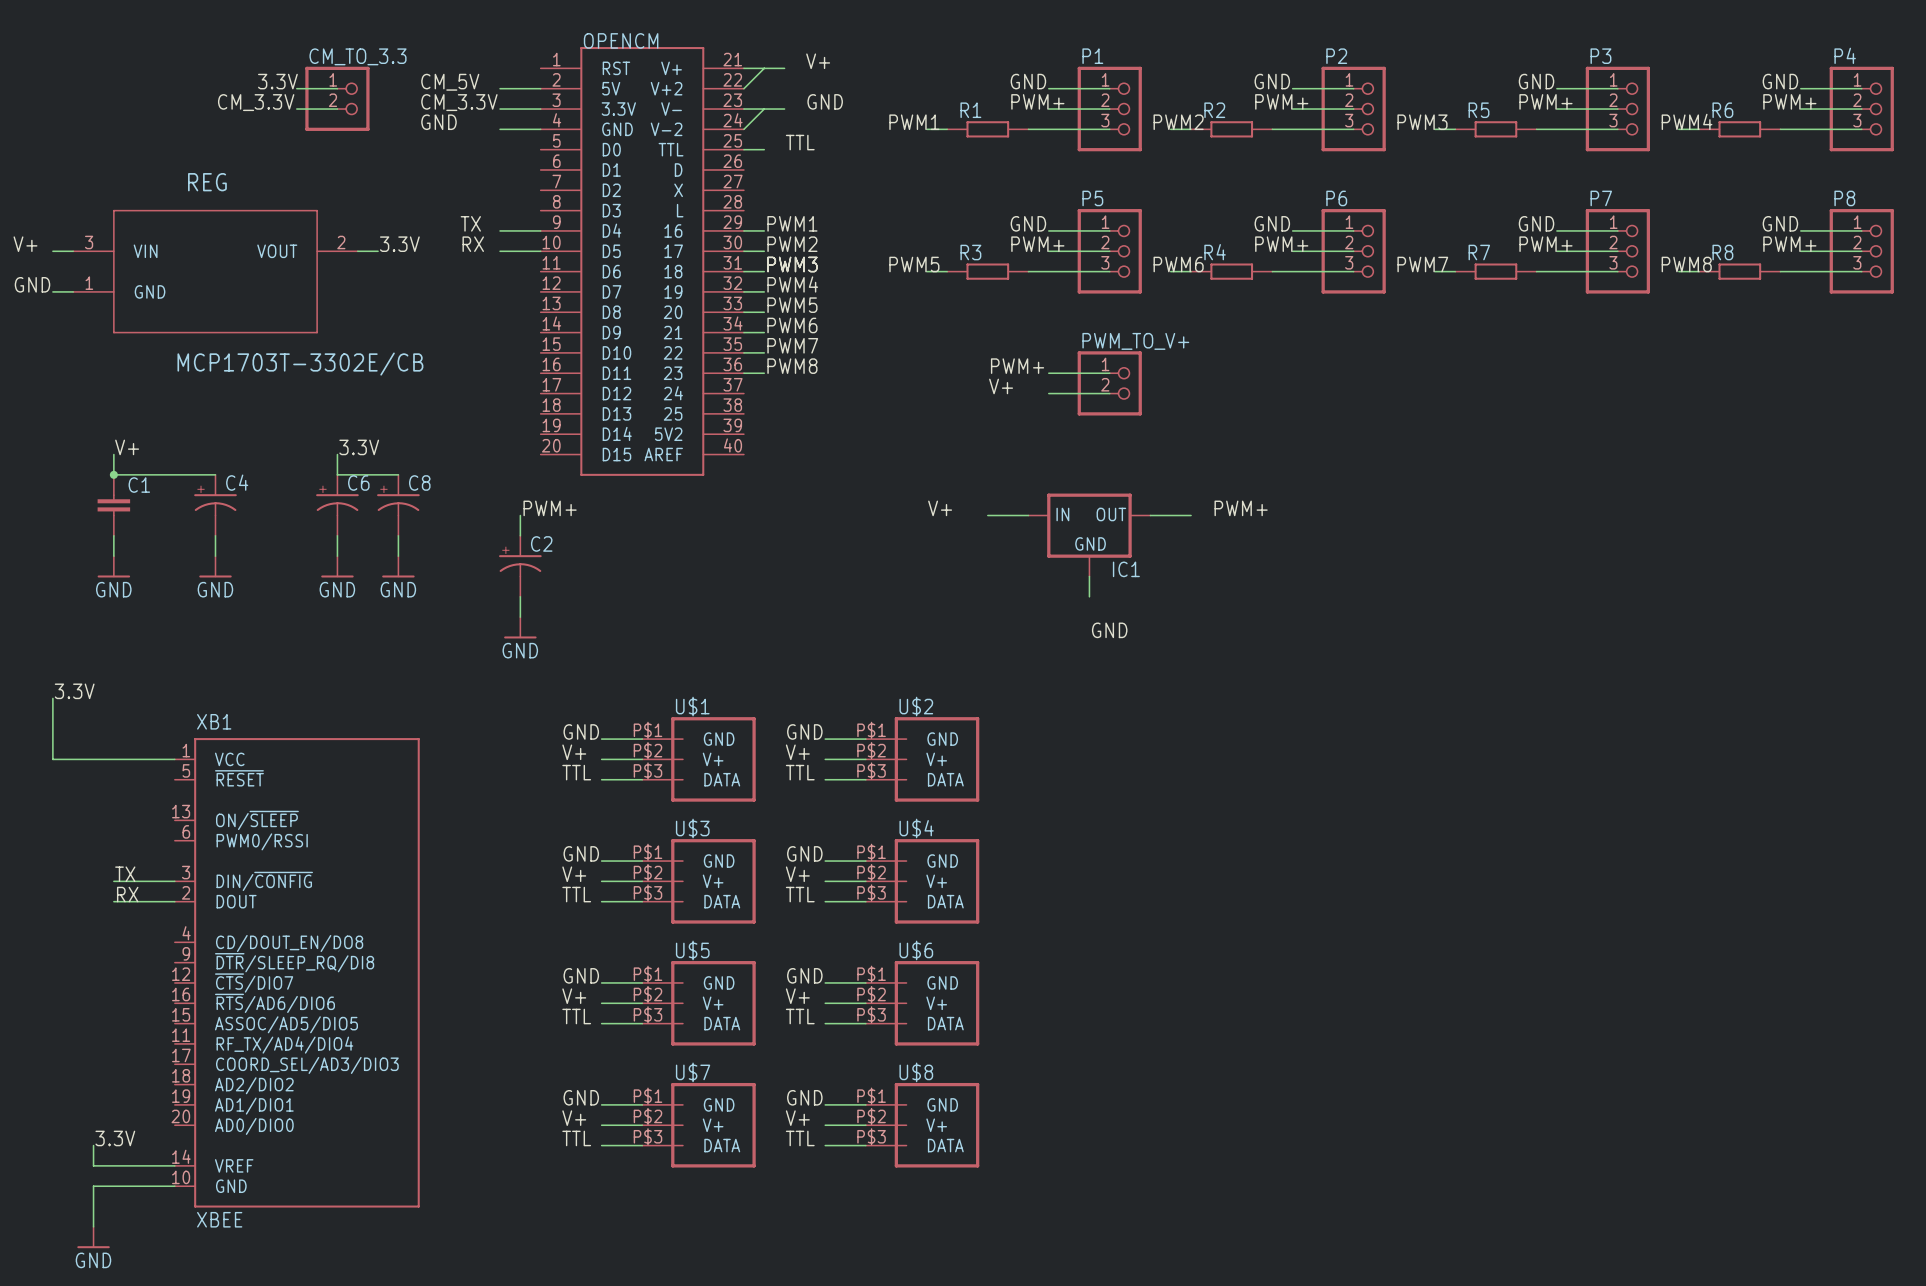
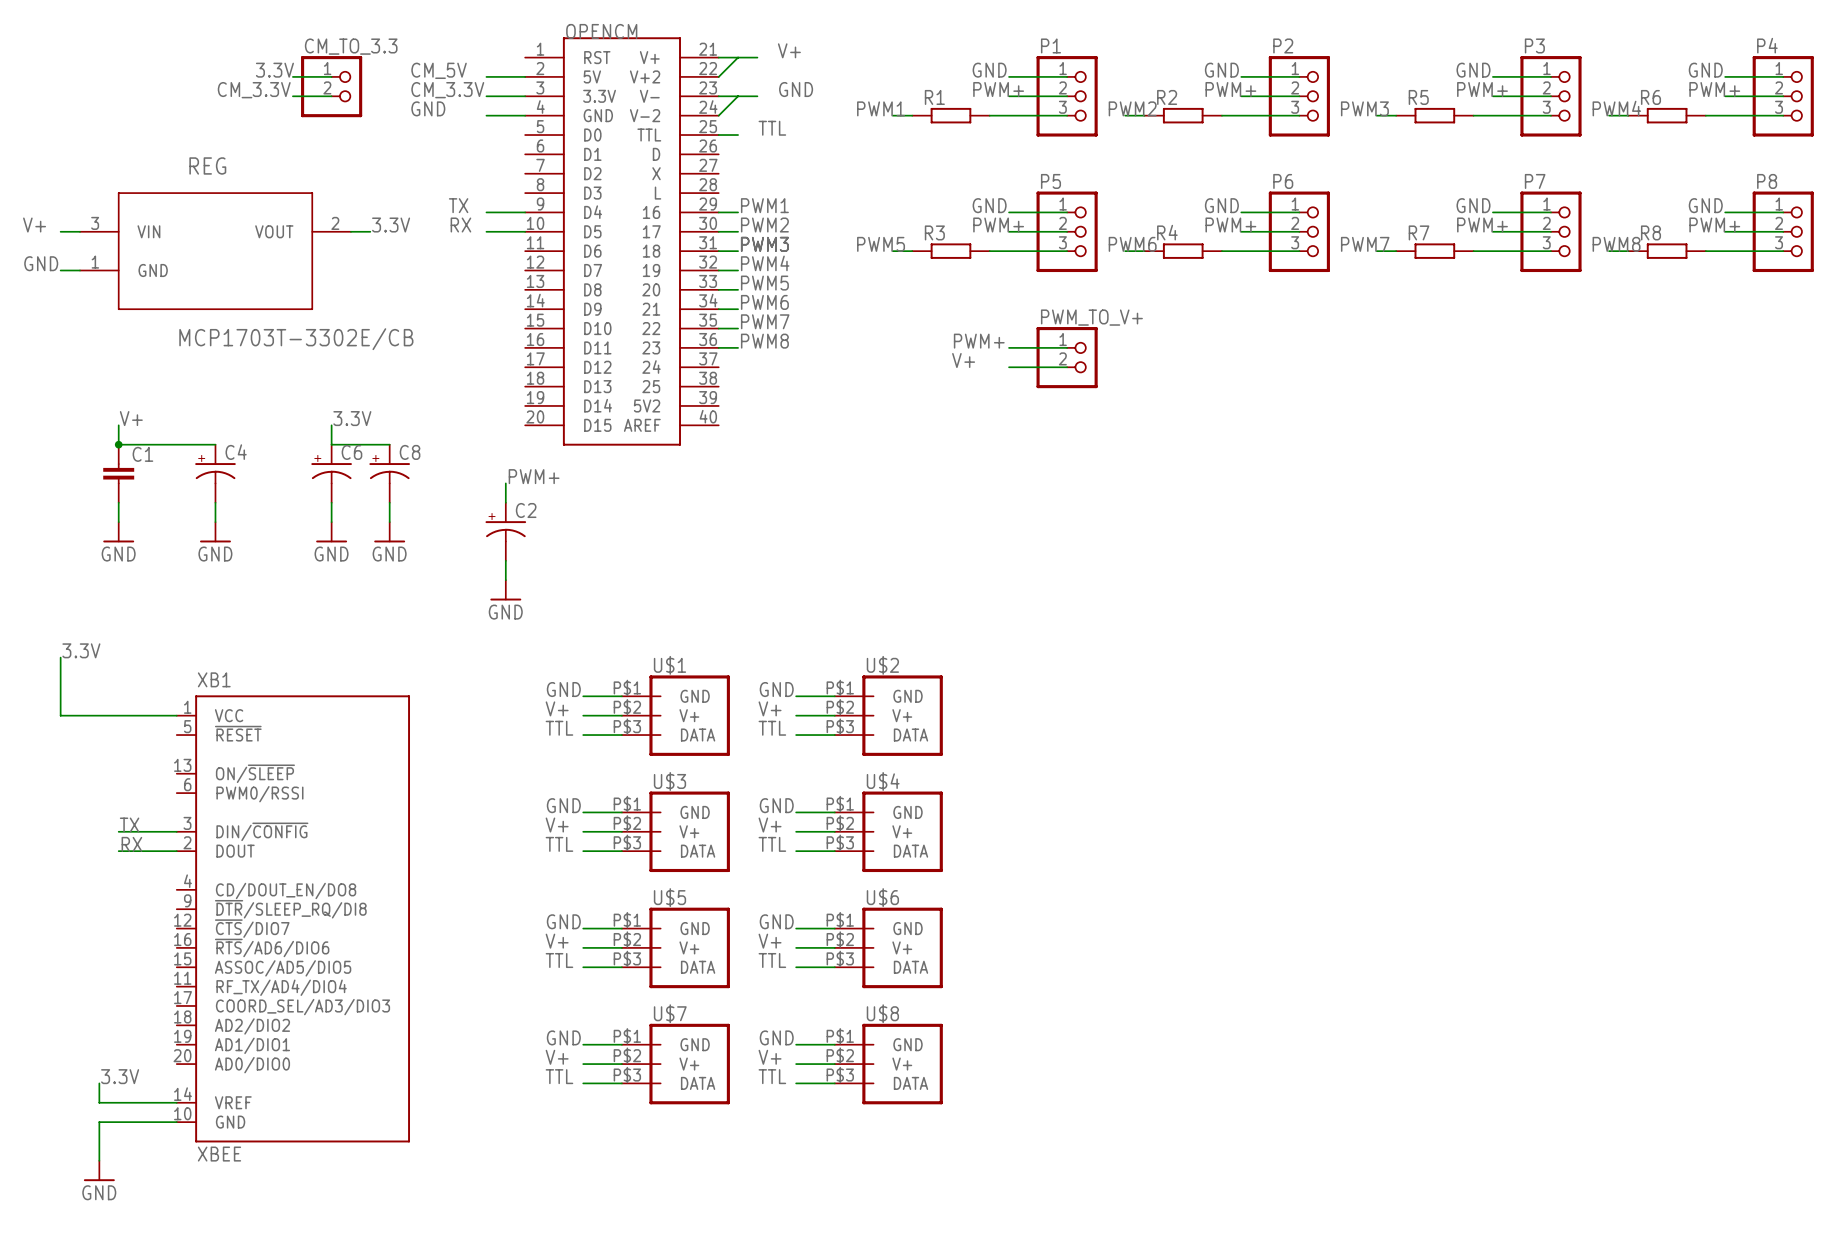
label: V+ (940, 508) -> none
label: PWM+ (1241, 508) -> none
wire: (987, 515) (1028, 515) -> none
wire: (1150, 515) (1191, 515) -> none
IC1: (1089, 535) -> none
wire: (1089, 576) (1089, 596) -> none
label: GND (1109, 630) -> none

